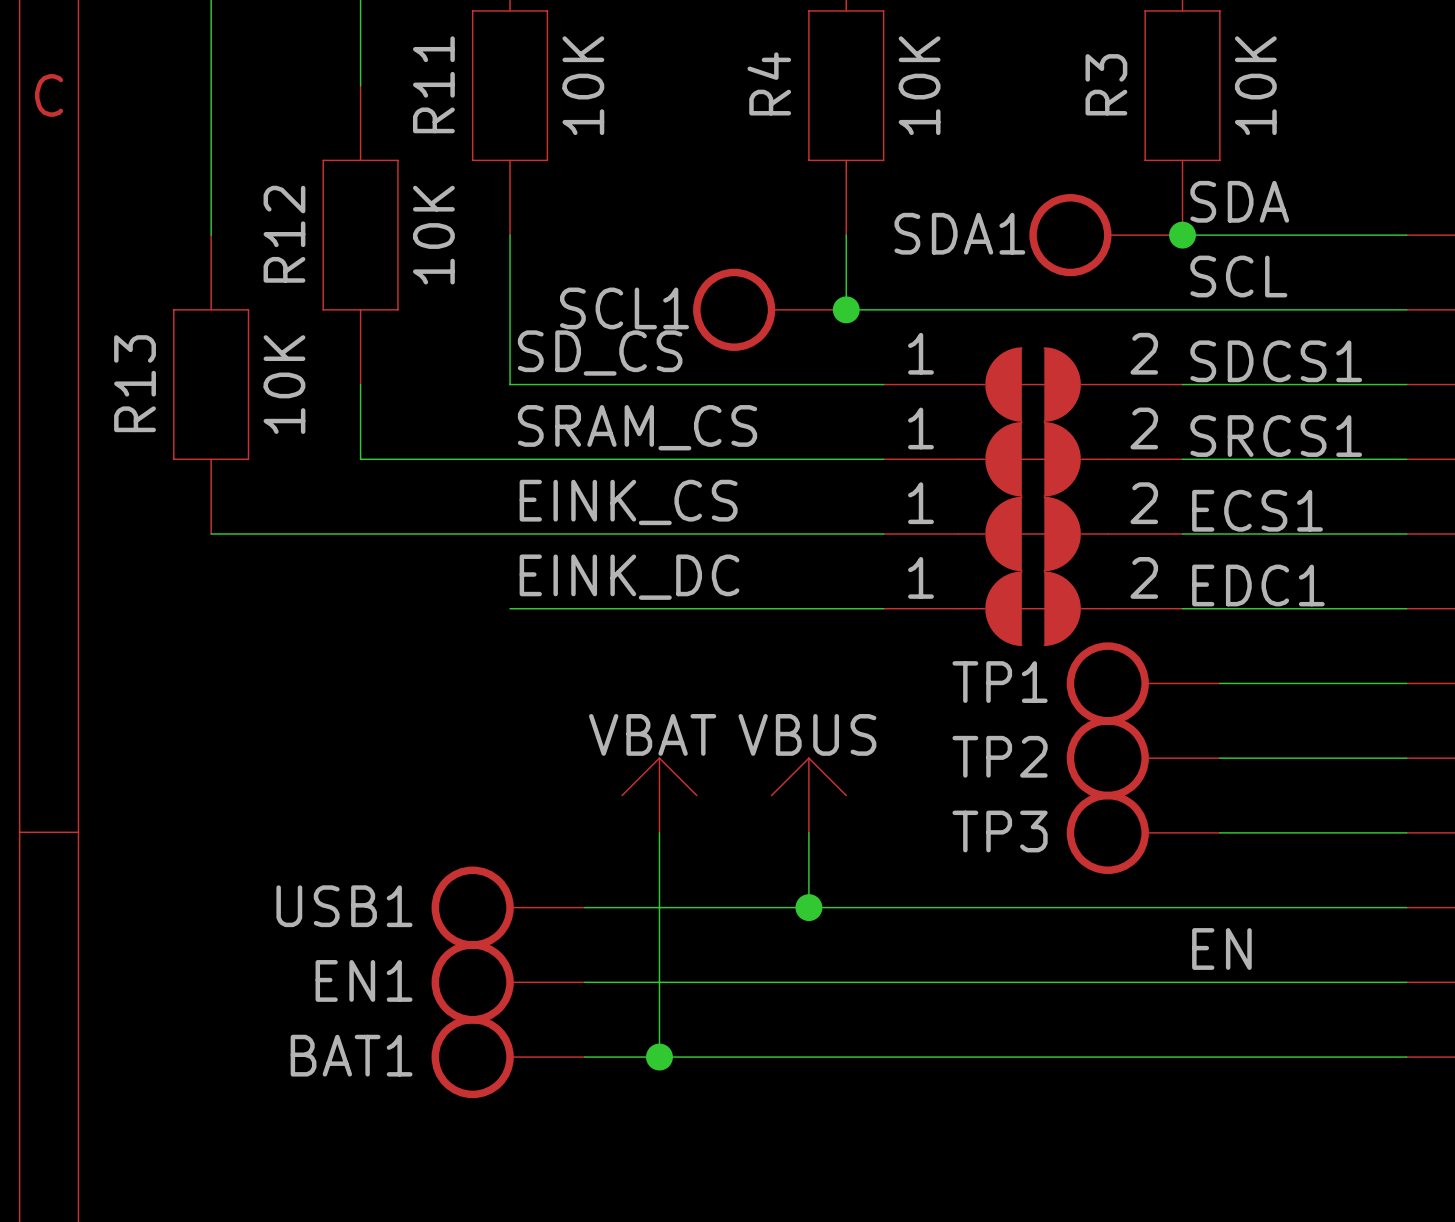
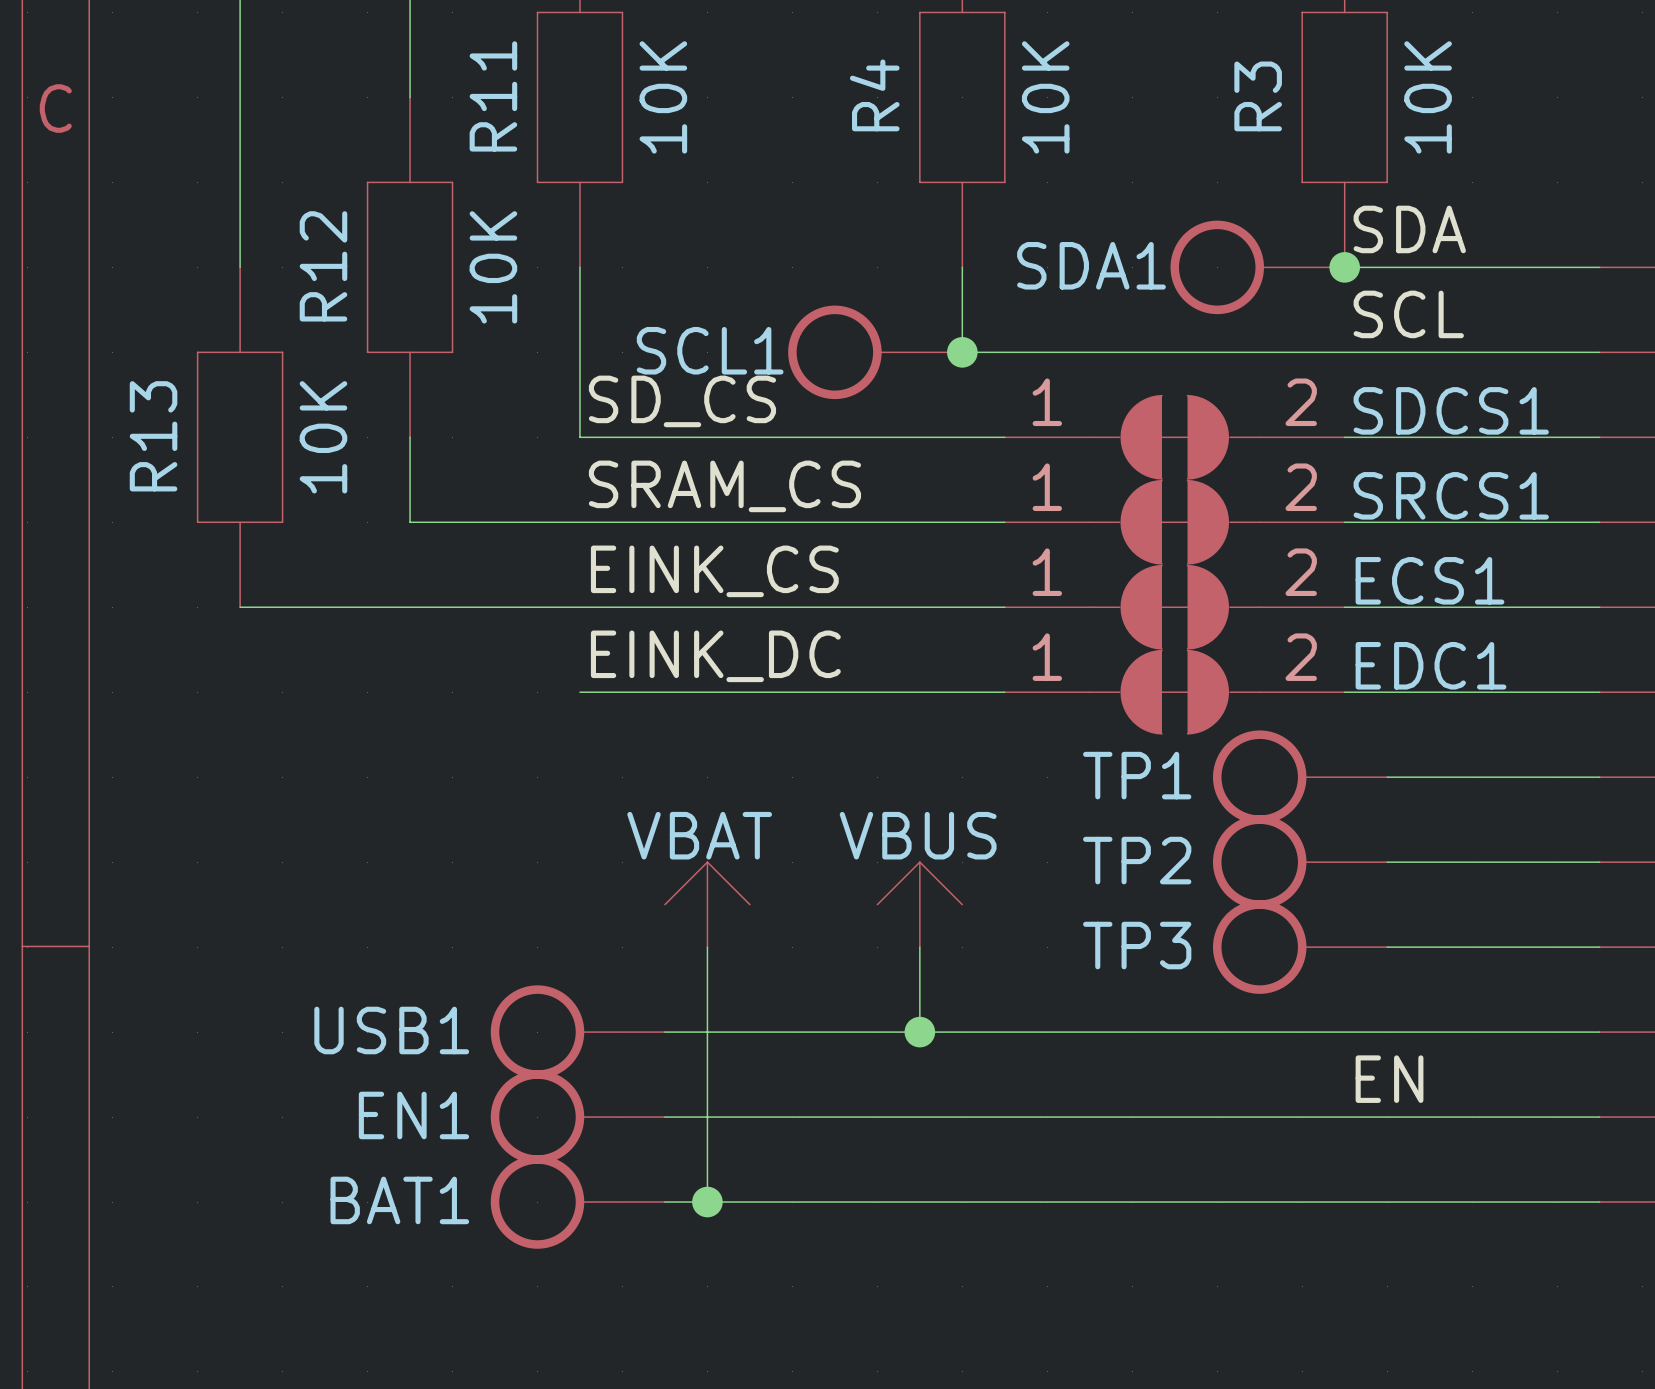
power symbol position: VBAT (659, 795) -> VBAT (707, 904)
wire: (659, 832) (659, 1057) -> (707, 947) (707, 1202)
junction position: (659, 1057) -> (707, 1202)

